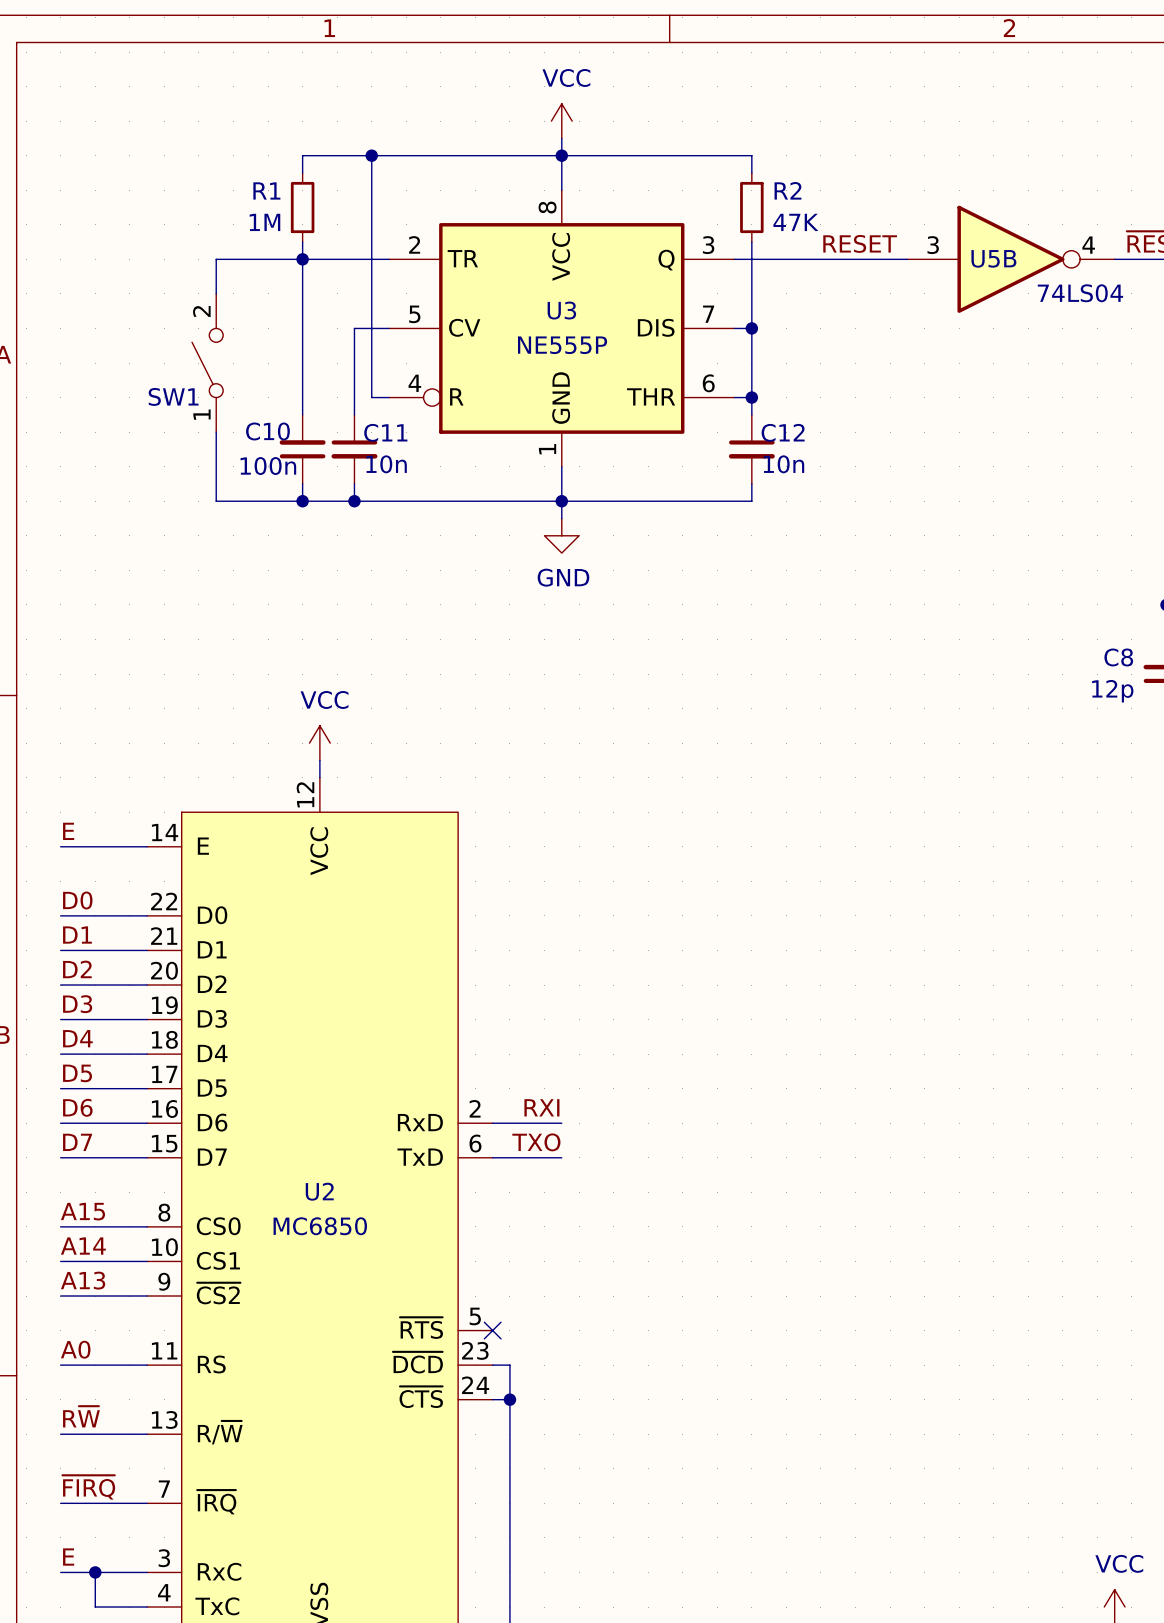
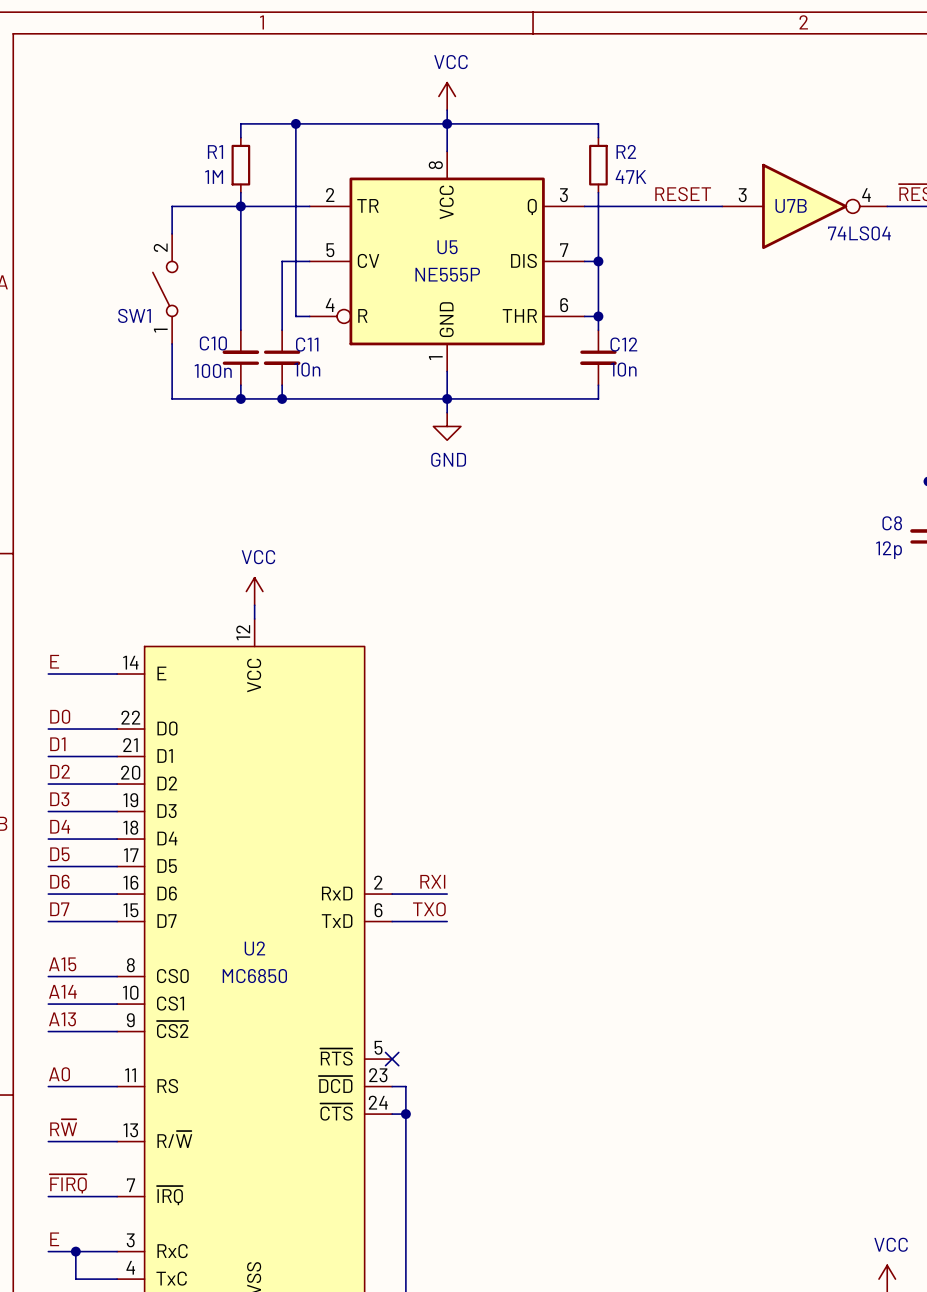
U5B name: U5B (993, 258) -> U7B (791, 205)
U3 name: U3 (561, 310) -> U5 (447, 247)

